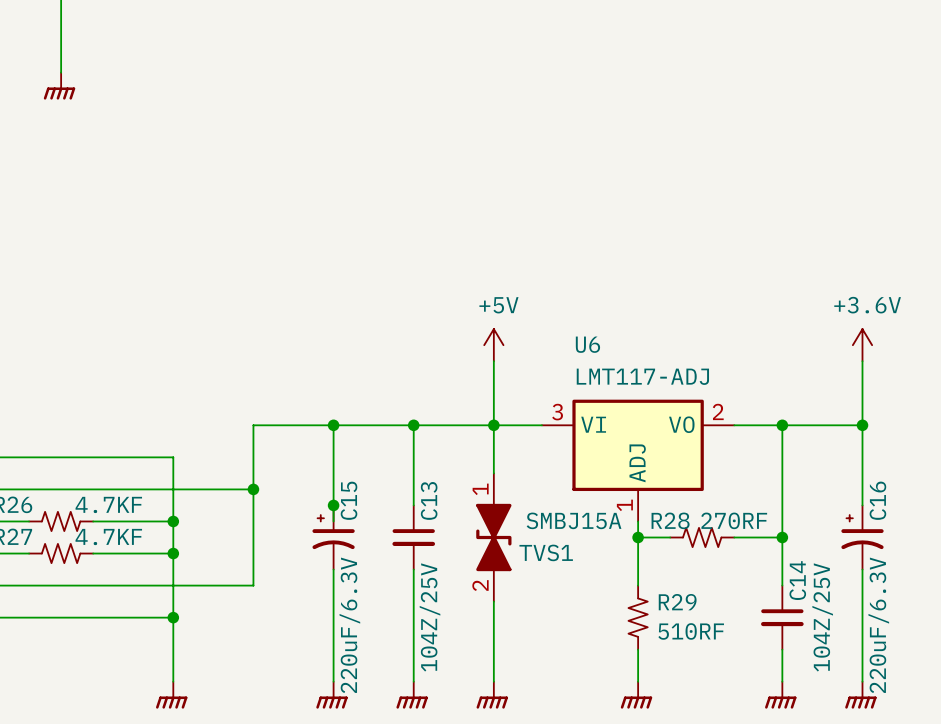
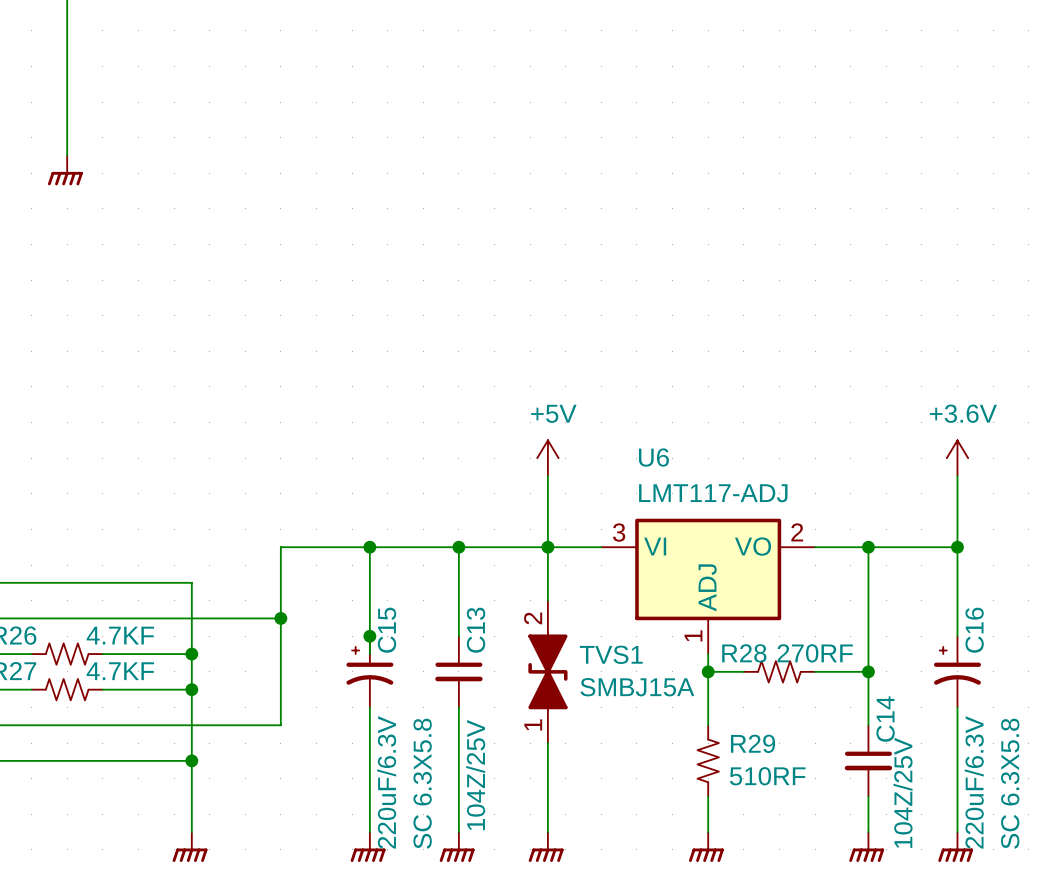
TVS1 value position: SMBJ15A (574, 520) -> SMBJ15A (637, 687)
TVS1 rotation: 0° (493, 537) -> 180° (547, 671)
TVS1 name position: TVS1 (546, 552) -> TVS1 (611, 654)
C13 text: 104Z/25V (430, 617) -> none
C14 text: 104Z/25V (822, 617) -> none
C15 text: 220uF/6.3V (349, 625) -> none
C16 text: 220uF/6.3V (878, 625) -> none
C13 text: none -> 104Z/25V (475, 775)
C15 text: none -> 220uF/6.3V (386, 782)
C16 text: none -> 220uF/6.3V (974, 782)
C15 text: none -> SC 6.3X5.8 (422, 783)
C16 text: none -> SC 6.3X5.8 (1010, 783)
C14 text: none -> 104Z/25V (903, 792)

